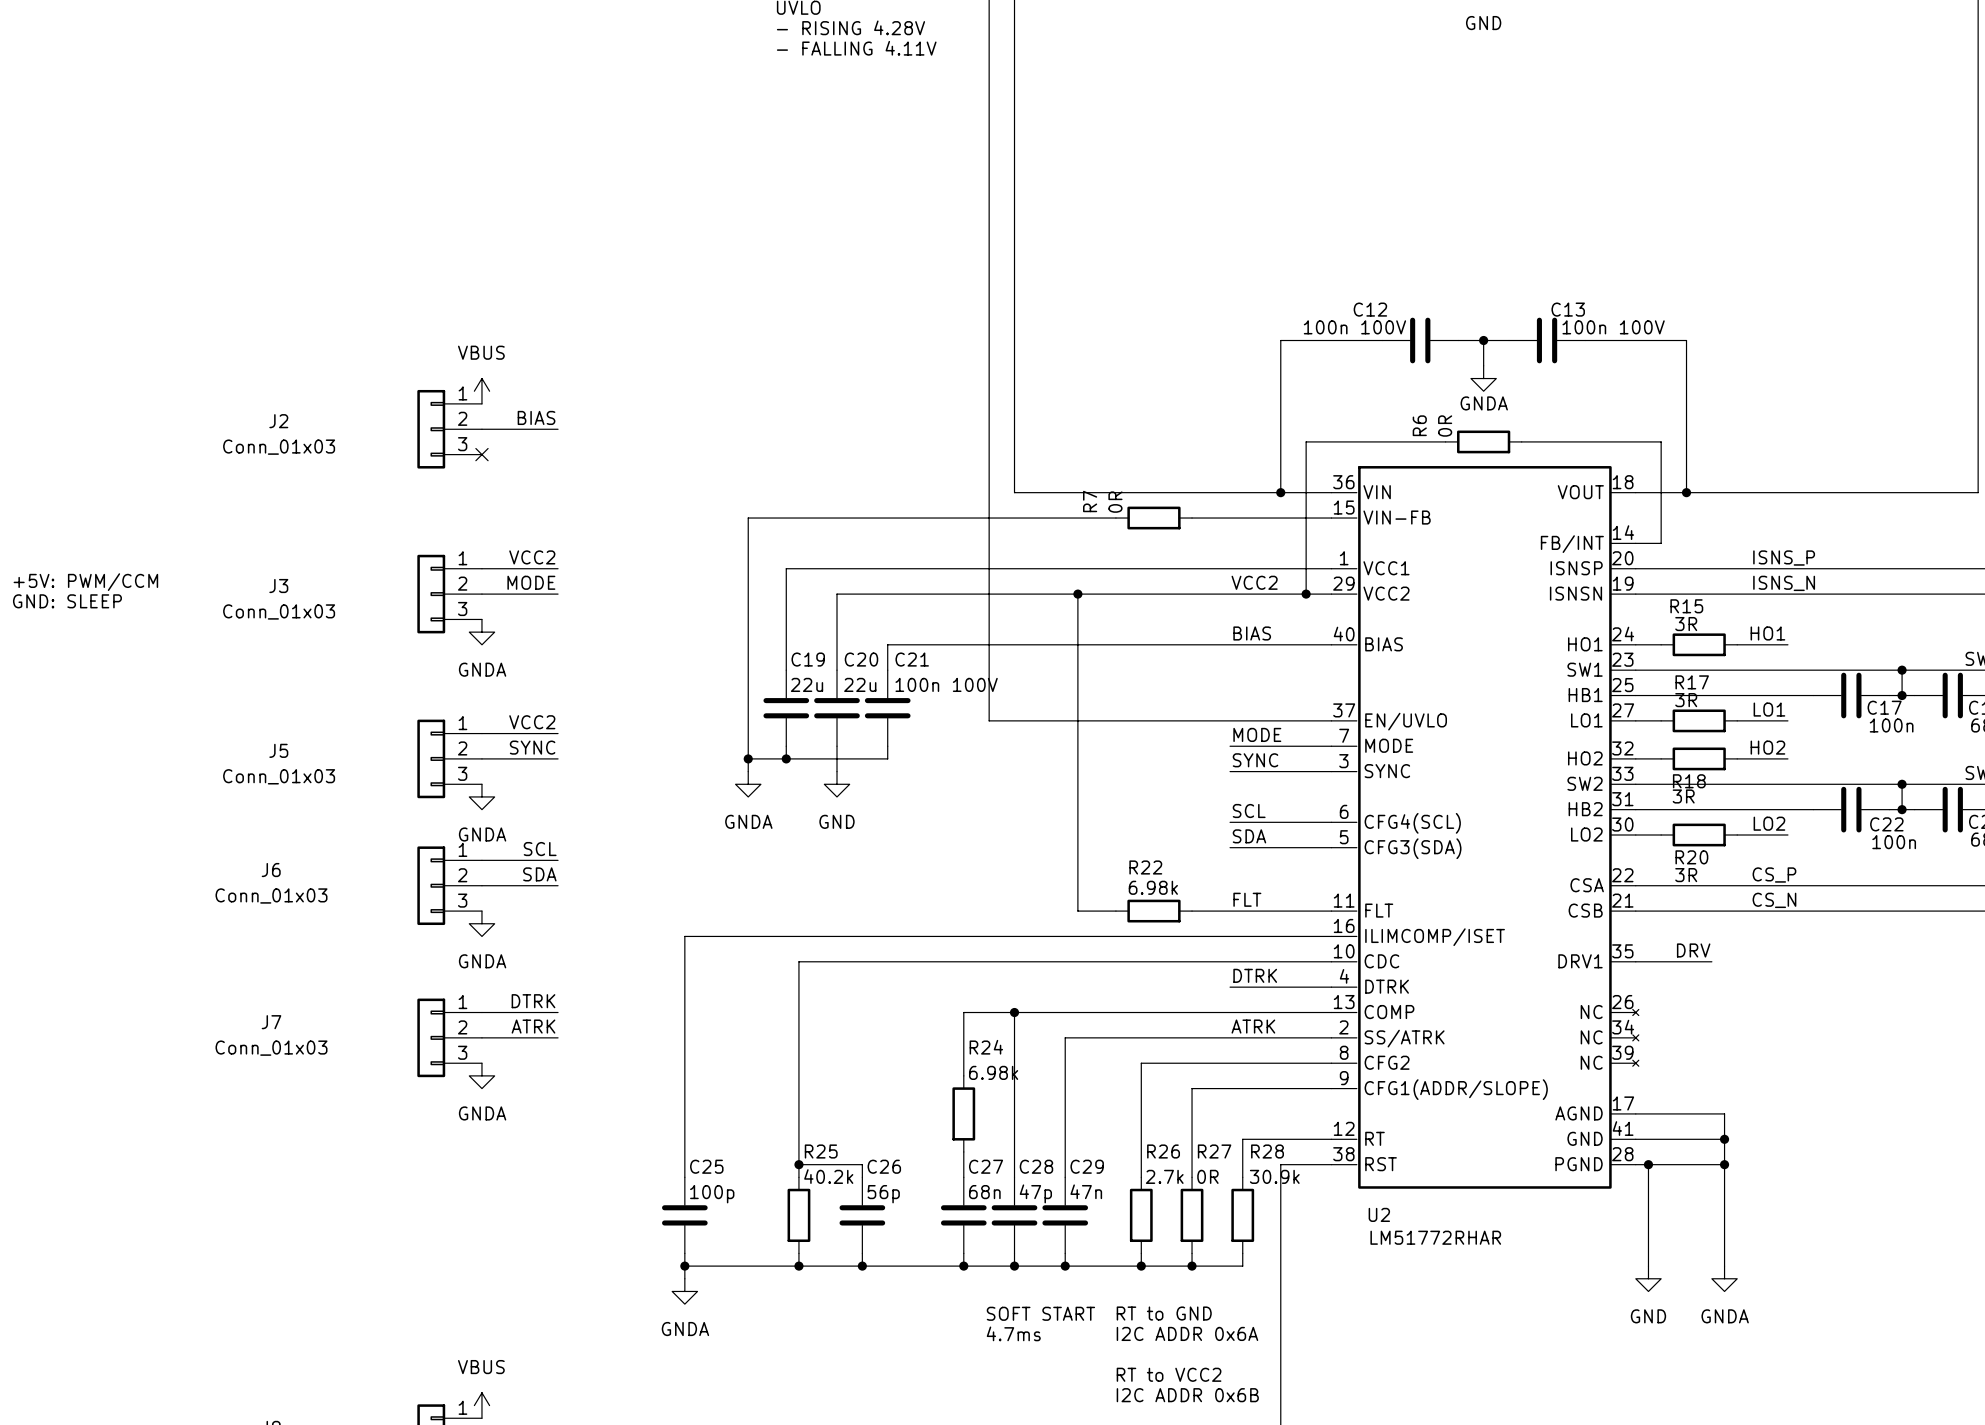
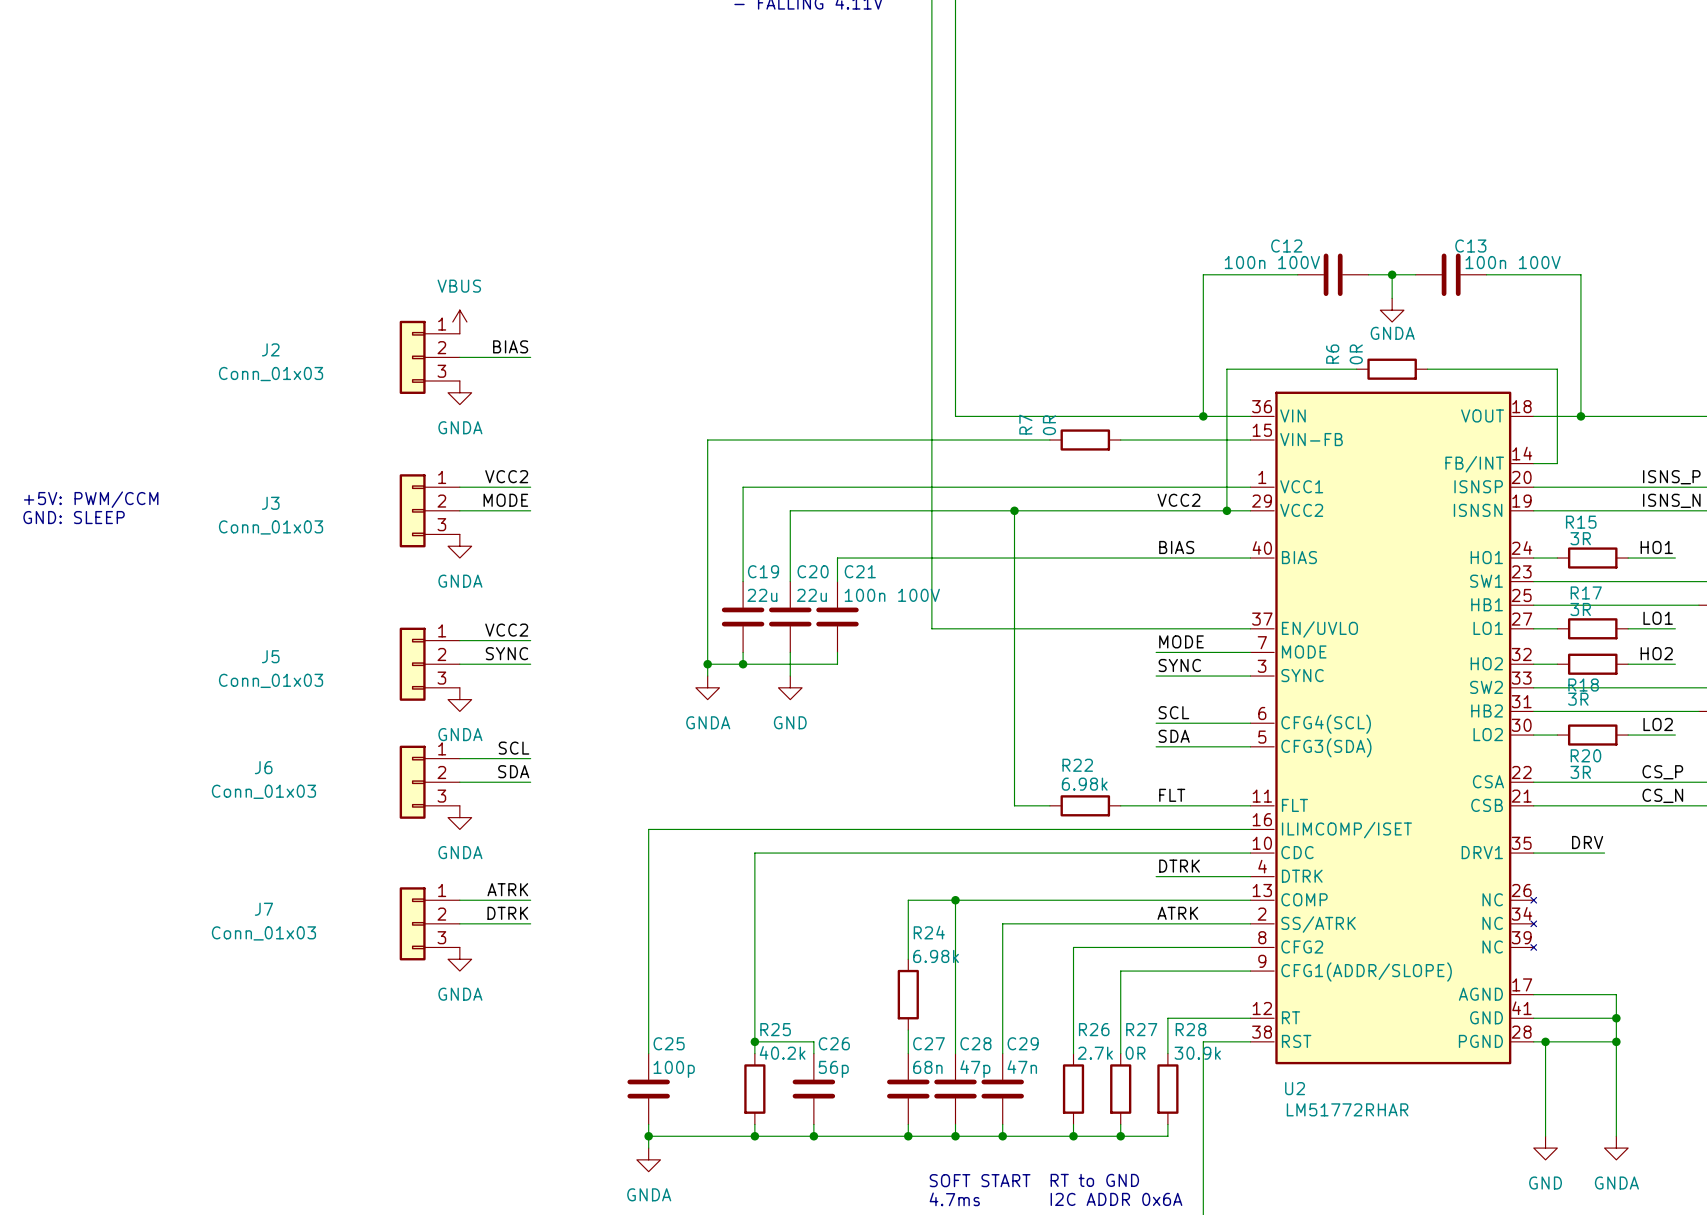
no-connect mark: (481, 454) -> none
power symbol: none -> GNDA (459, 392)
label: DTRK (533, 1001) -> ATRK (507, 889)
label: ATRK (533, 1026) -> DTRK (507, 913)

